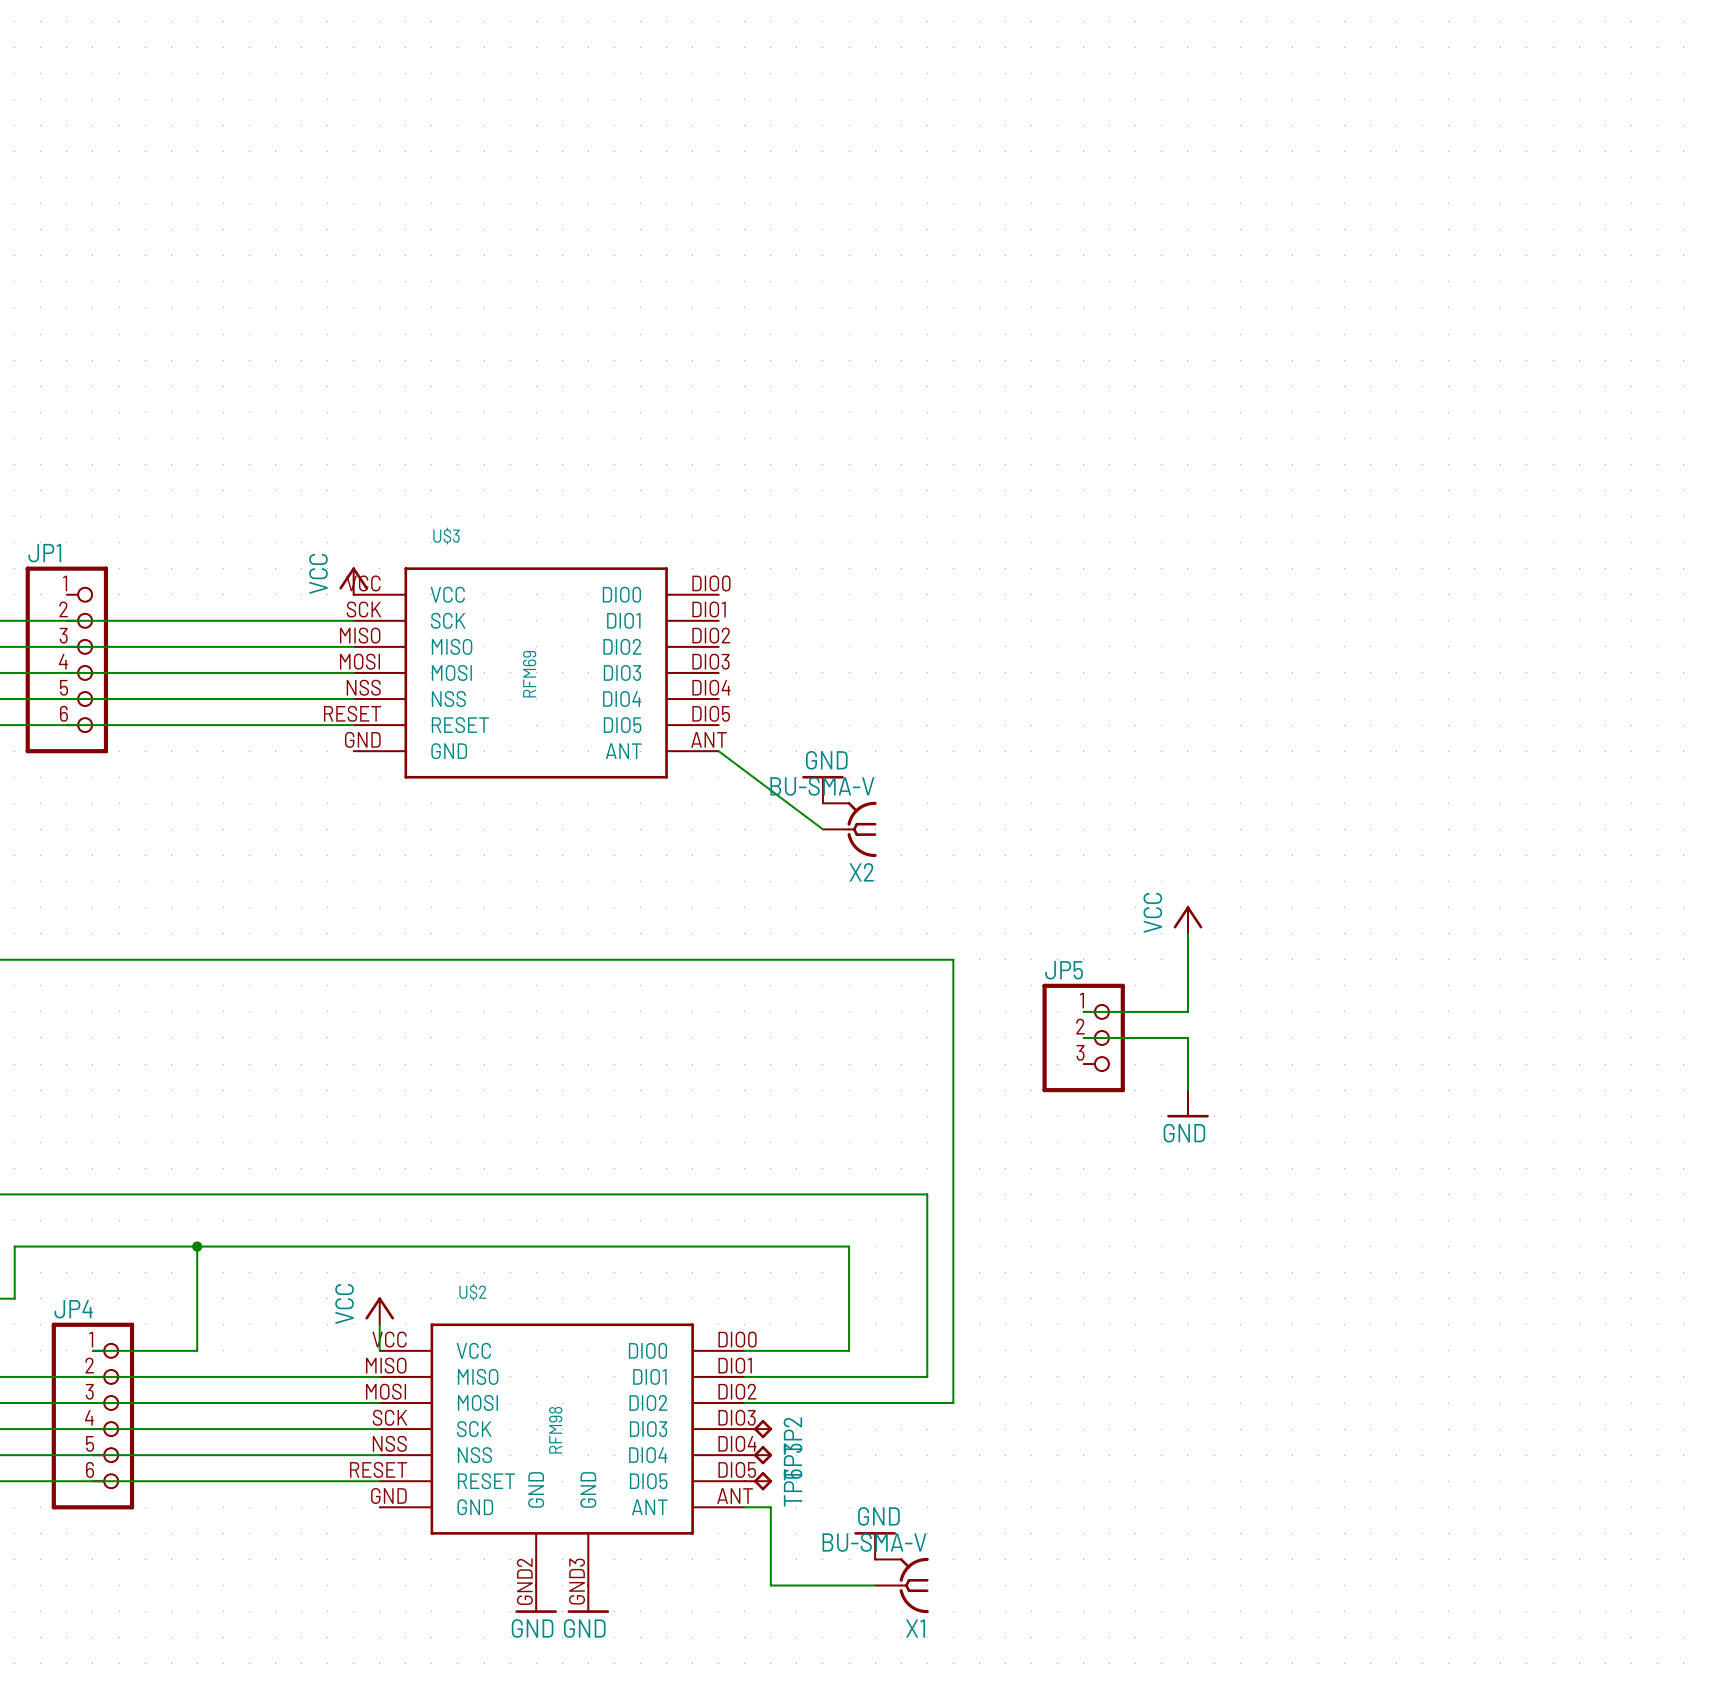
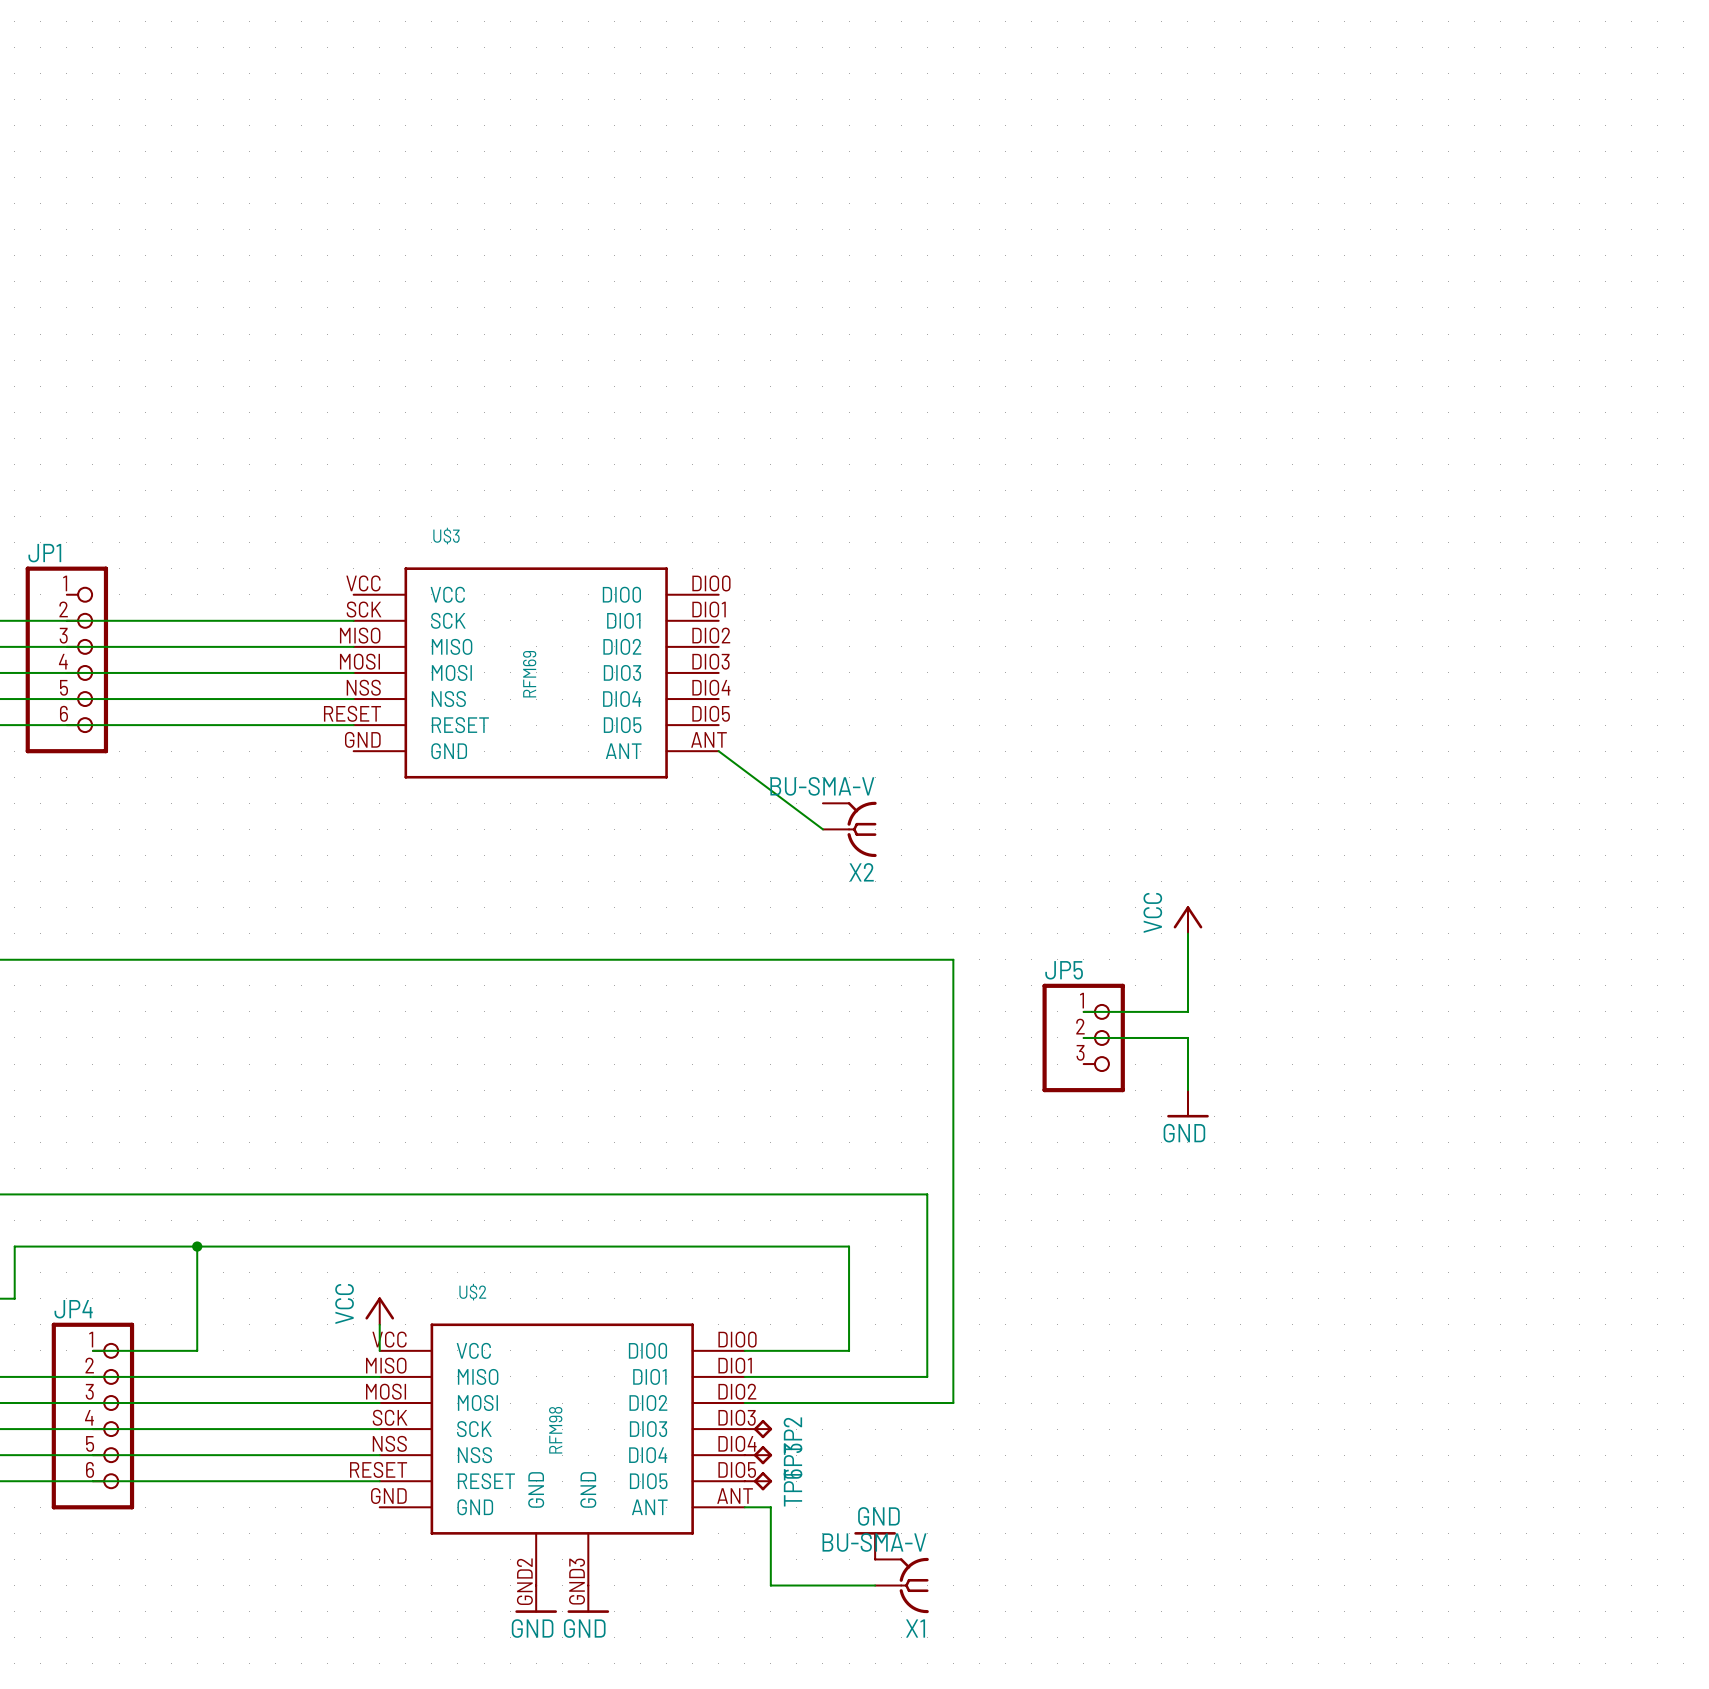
power symbol: VCC (353, 581) -> none
power symbol: GND (822, 789) -> none

